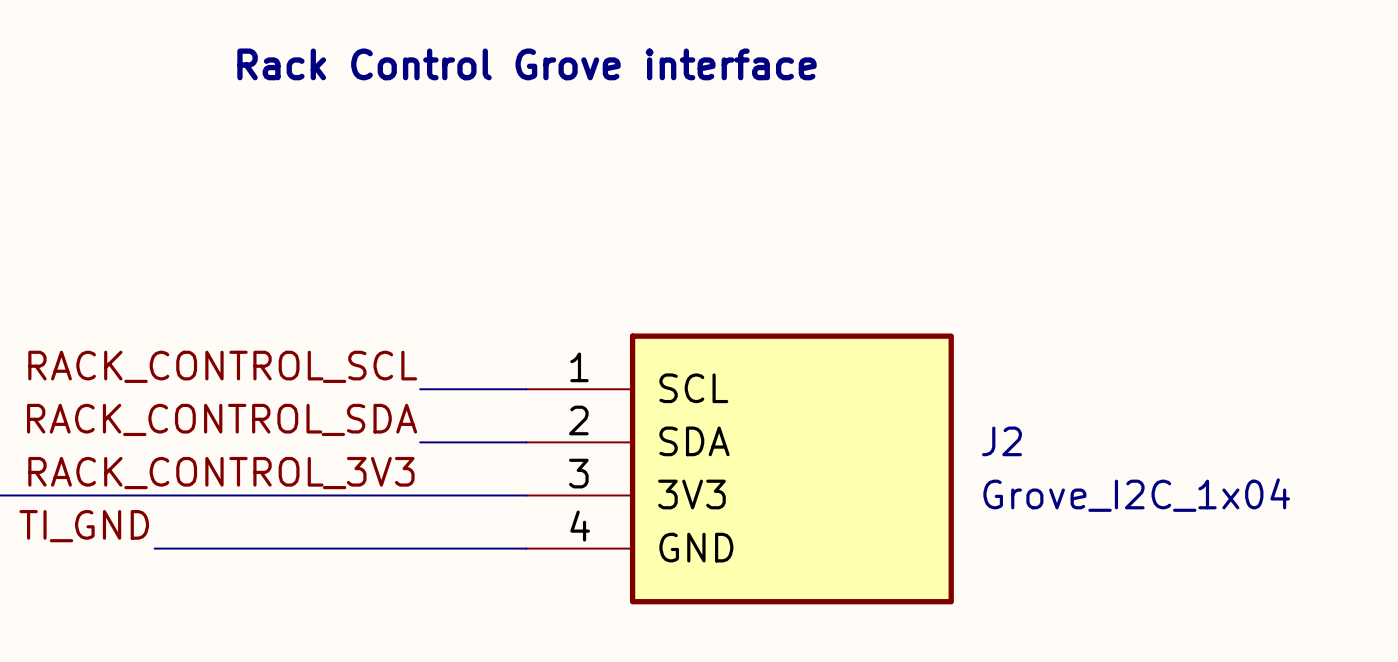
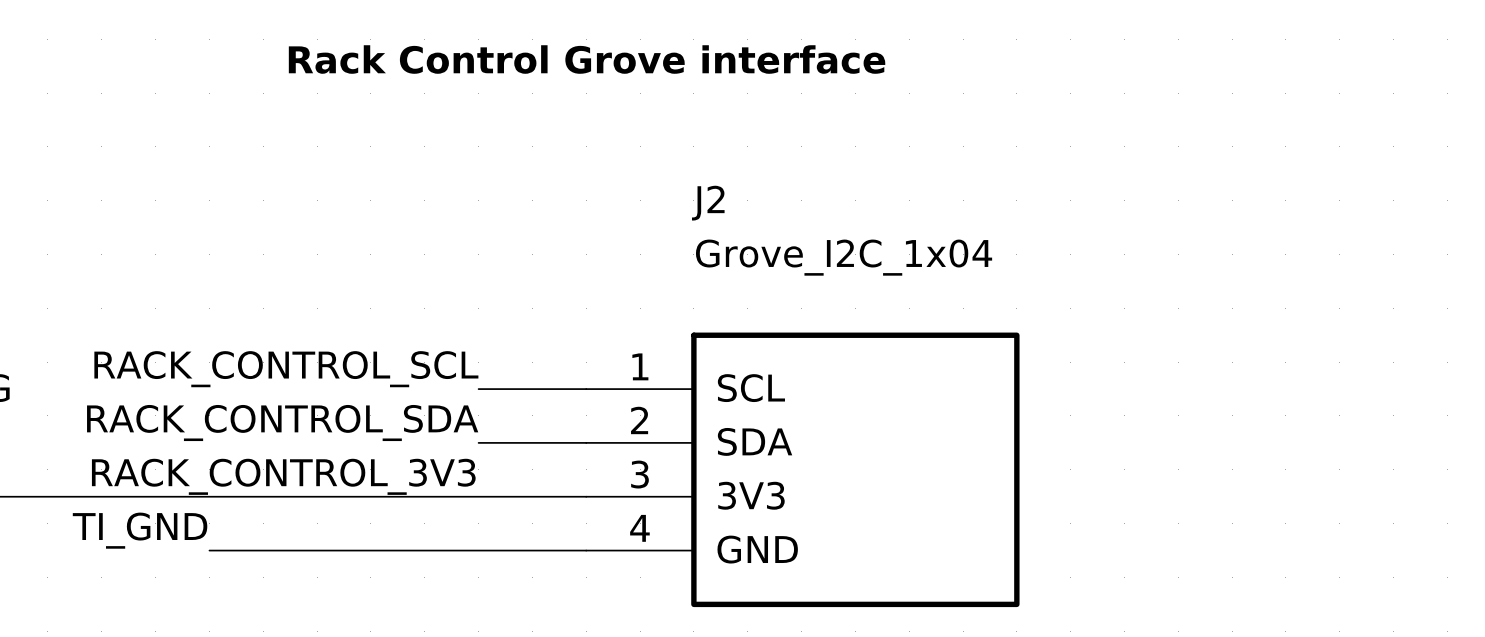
J2 name position: J2 (1002, 441) -> J2 (708, 203)
J2 value position: Grove_I2C_1x04 (1136, 495) -> Grove_I2C_1x04 (844, 257)

